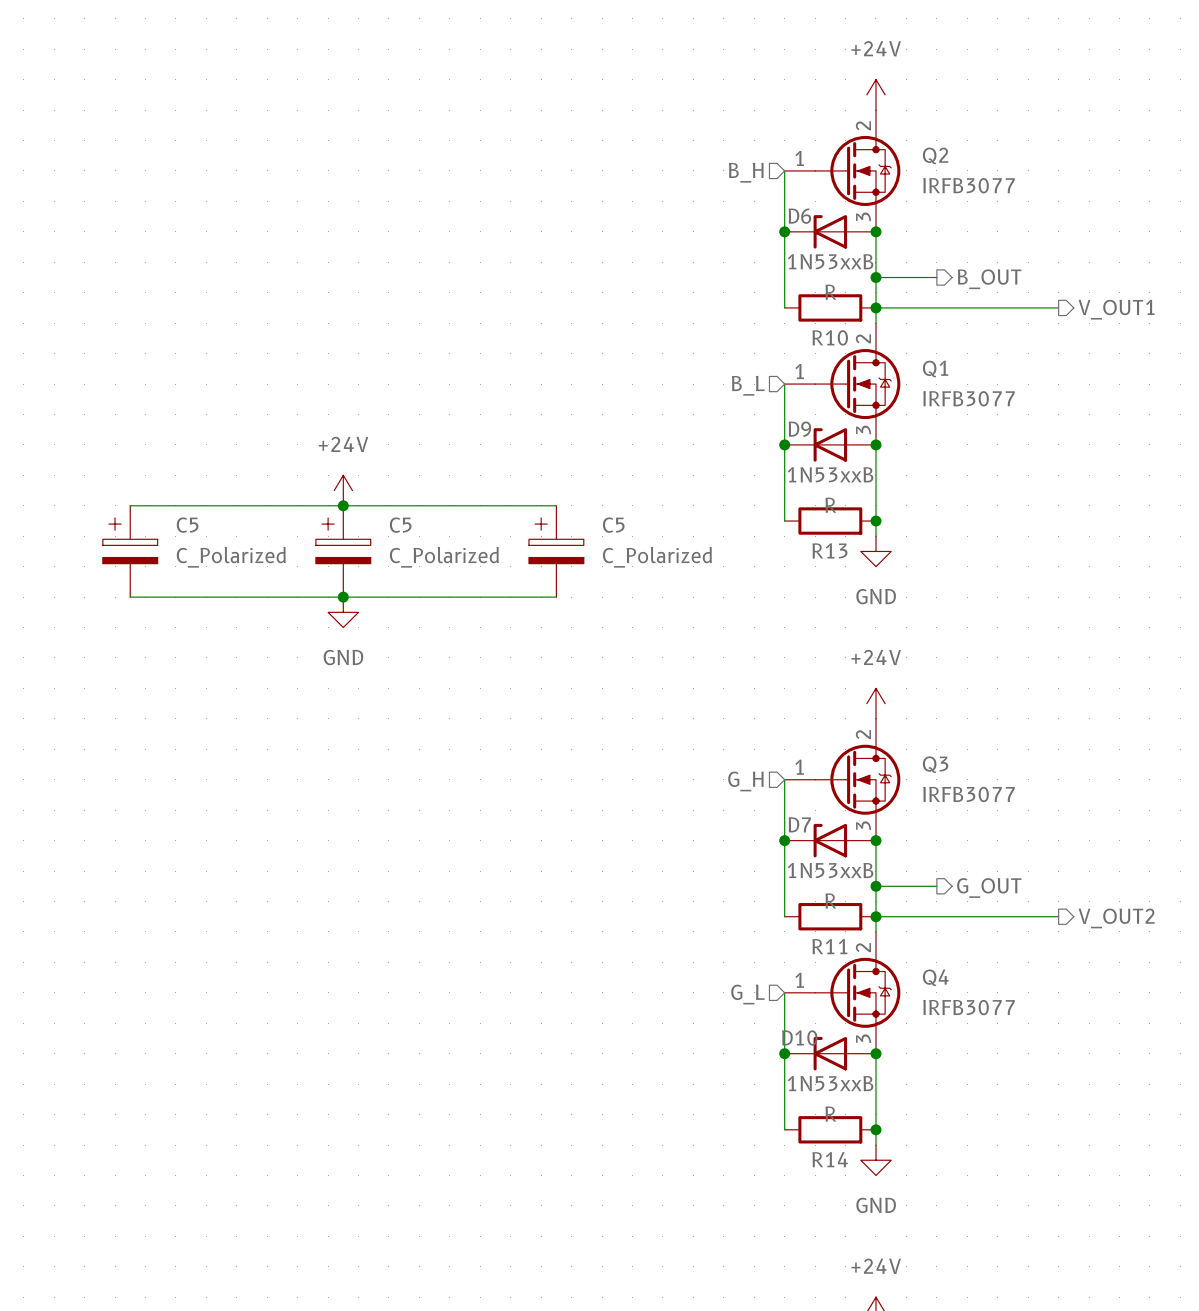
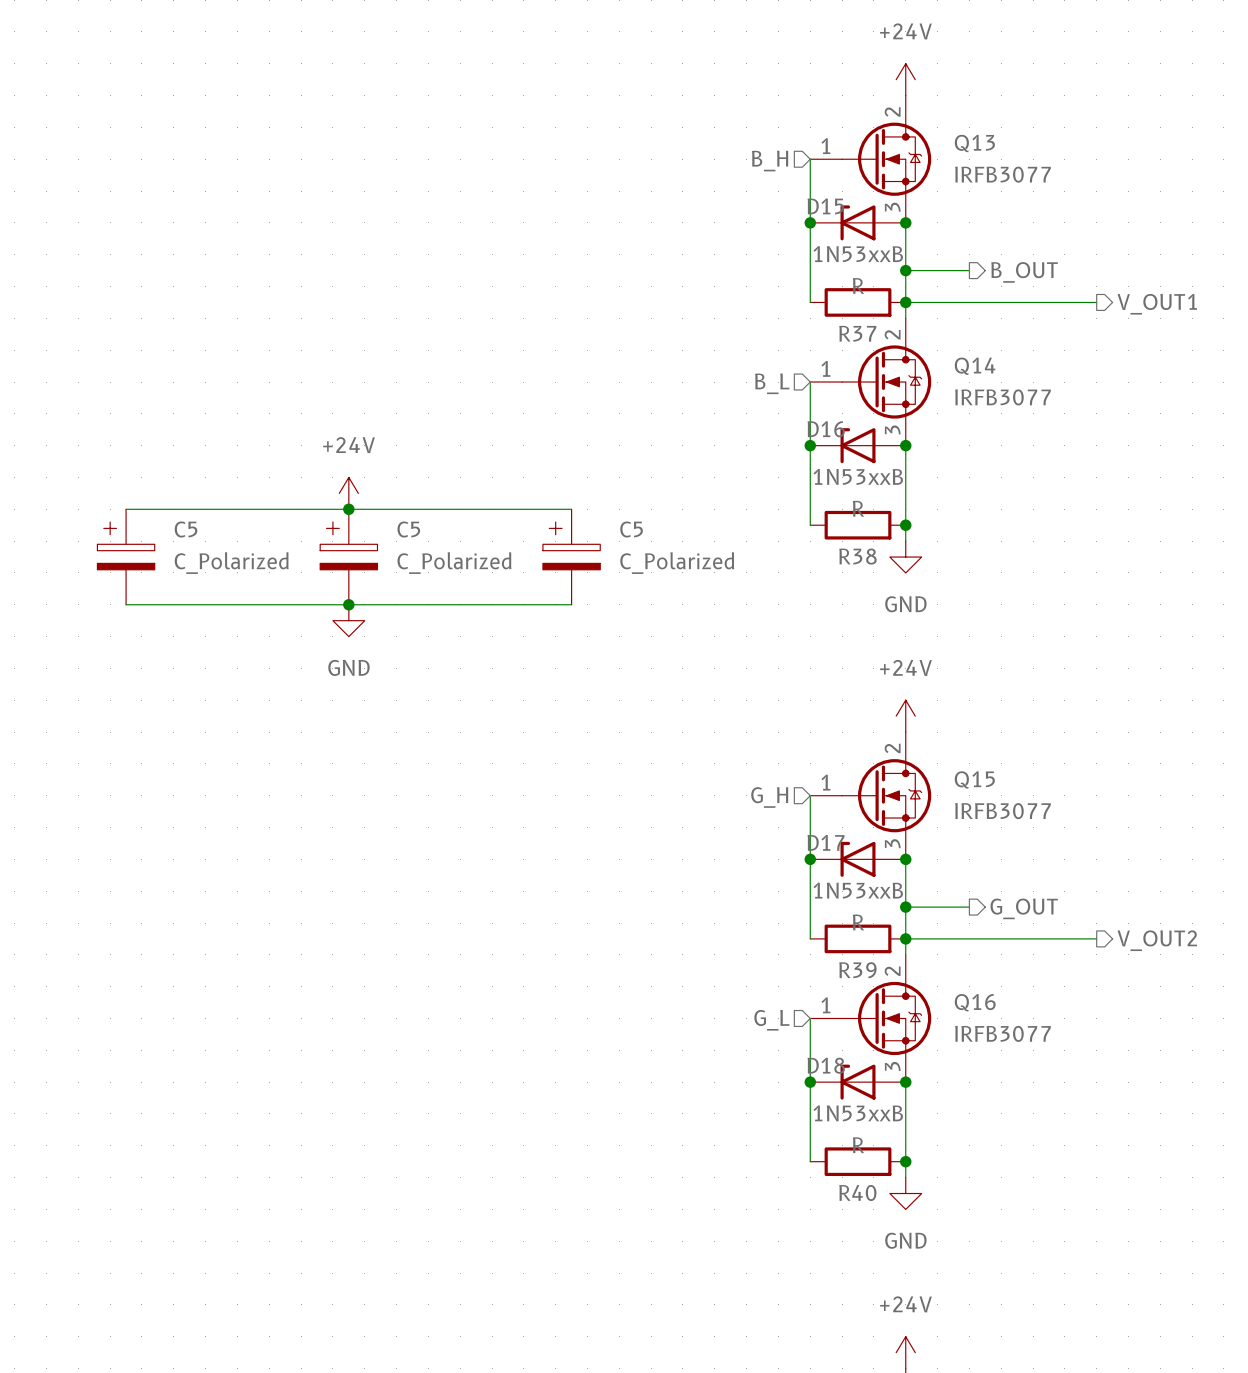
Q2 name: Q2 (935, 155) -> Q13 (974, 143)
D6 name: D6 (799, 216) -> D15 (825, 206)
R10 name: R10 (830, 337) -> R37 (857, 333)
Q1 name: Q1 (935, 368) -> Q14 (975, 366)
D9 name: D9 (799, 429) -> D16 (826, 429)
R13 name: R13 (829, 550) -> R38 (857, 556)
Q3 name: Q3 (935, 764) -> Q15 (974, 779)
D7 name: D7 (799, 824) -> D17 (826, 842)
R11 name: R11 (829, 946) -> R39 (857, 970)
Q4 name: Q4 (935, 977) -> Q16 (975, 1002)
D10 name: D10 (799, 1038) -> D18 (826, 1065)
R14 name: R14 (830, 1159) -> R40 (857, 1193)

